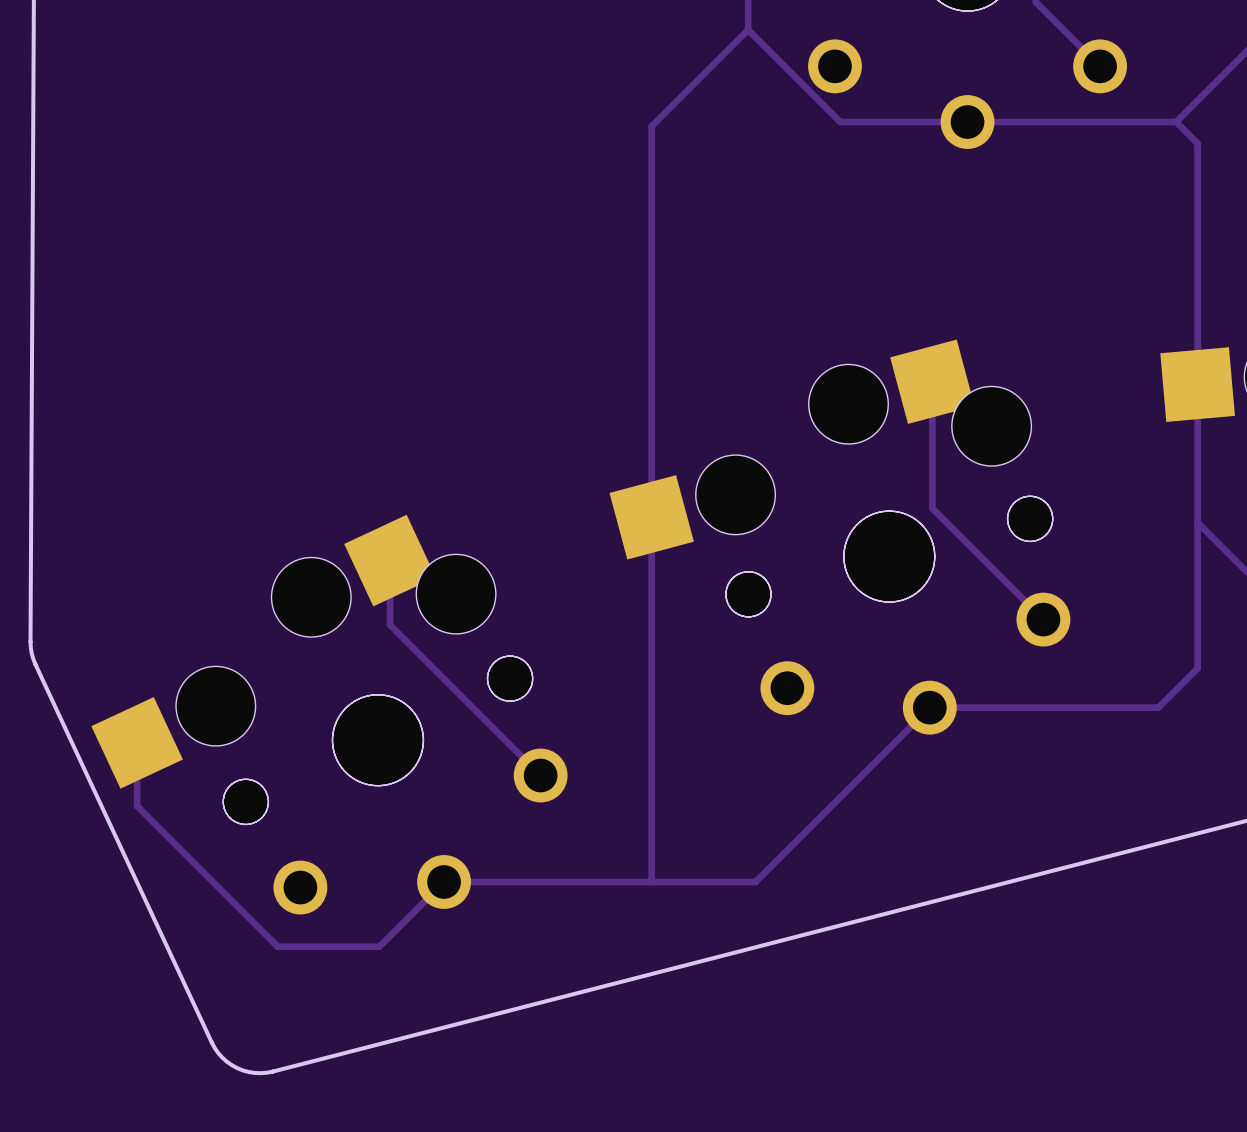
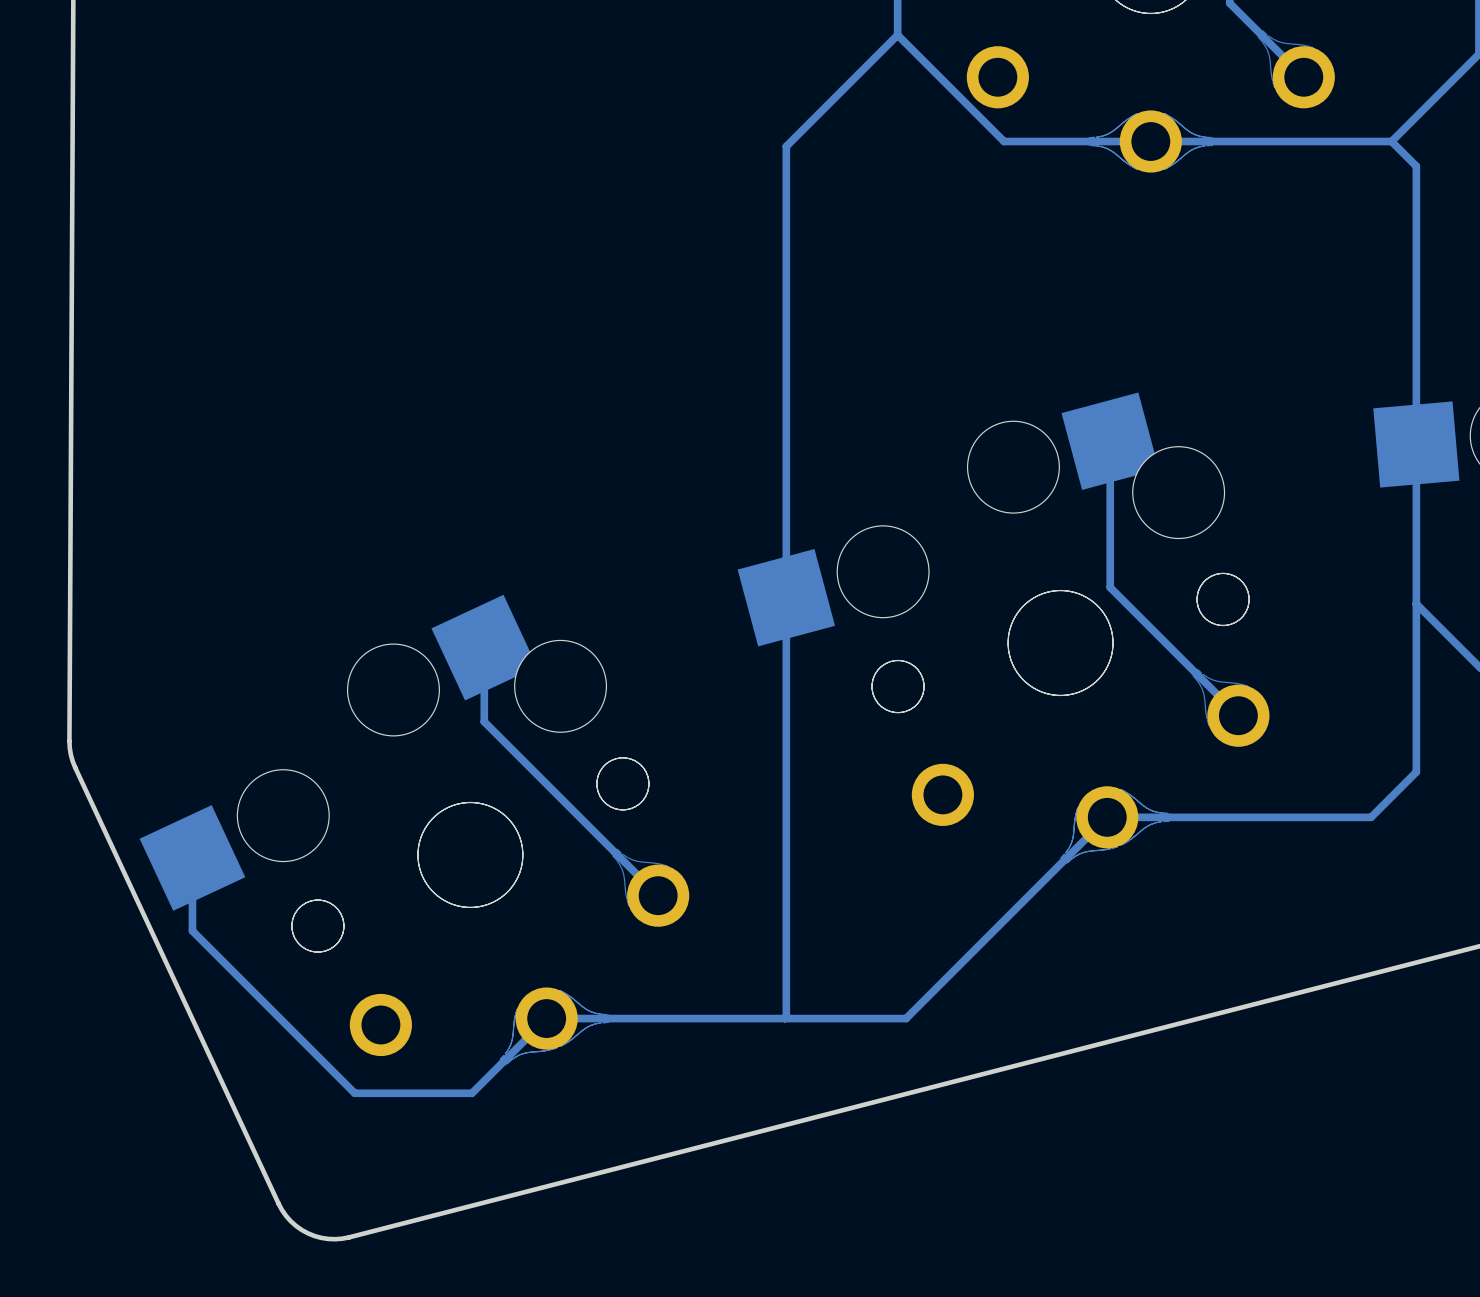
zone outline: none -> (1262, 30) (1277, 41) (1314, 47) (1314, 88) (1274, 87) (1267, 51) (1257, 36) (1262, 30)
zone outline: none -> (1137, 113) (1107, 134) (1088, 137) (1088, 145) (1107, 148) (1137, 169) (1166, 141) (1137, 113)
zone outline: none -> (1164, 113) (1135, 141) (1164, 169) (1194, 148) (1212, 145) (1212, 137) (1194, 134) (1164, 113)
zone outline: none -> (1197, 669) (1212, 679) (1248, 686) (1249, 726) (1209, 725) (1202, 689) (1191, 674) (1197, 669)
zone outline: none -> (1120, 789) (1091, 817) (1120, 845) (1150, 824) (1169, 821) (1169, 813) (1150, 810) (1120, 789)
zone outline: none -> (1118, 806) (1077, 807) (1071, 843) (1060, 858) (1066, 863) (1081, 853) (1117, 846) (1118, 806)
zone outline: none -> (617, 849) (632, 859) (668, 866) (669, 906) (628, 905) (622, 869) (611, 854) (617, 849)
zone outline: none -> (560, 990) (531, 1018) (560, 1046) (590, 1025) (608, 1022) (608, 1014) (590, 1011) (560, 990)
zone outline: none -> (557, 1007) (517, 1008) (510, 1044) (500, 1059) (505, 1065) (520, 1054) (556, 1047) (557, 1007)

